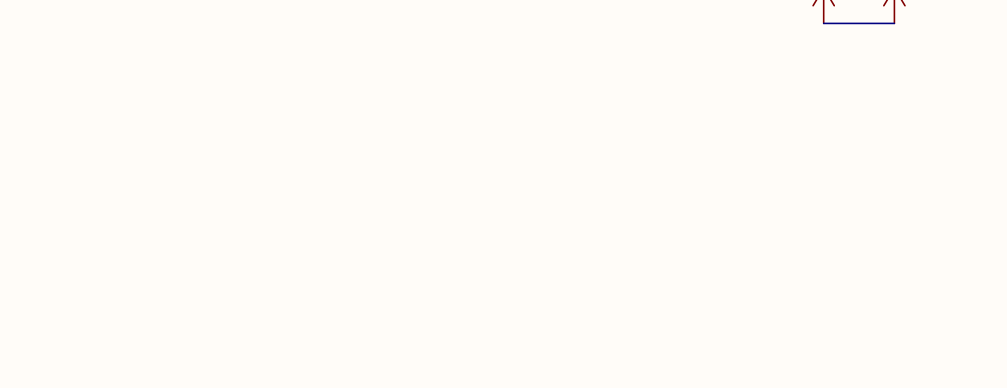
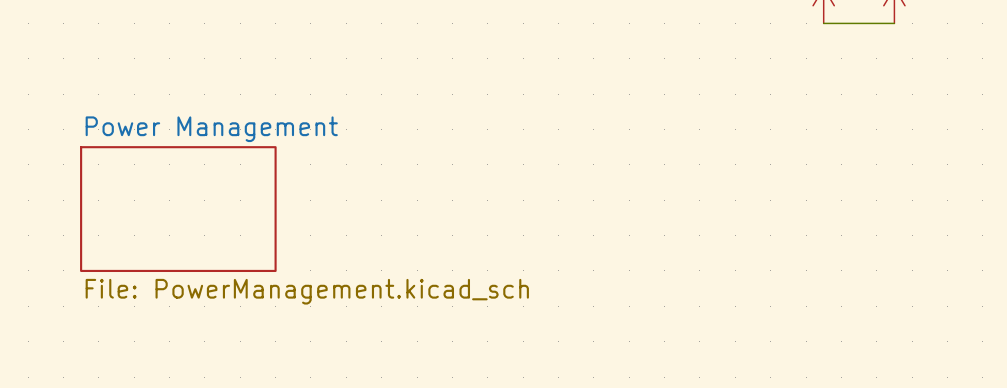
sheet Power Management: none -> File: PowerManagement.kicad_sch (178, 209)

